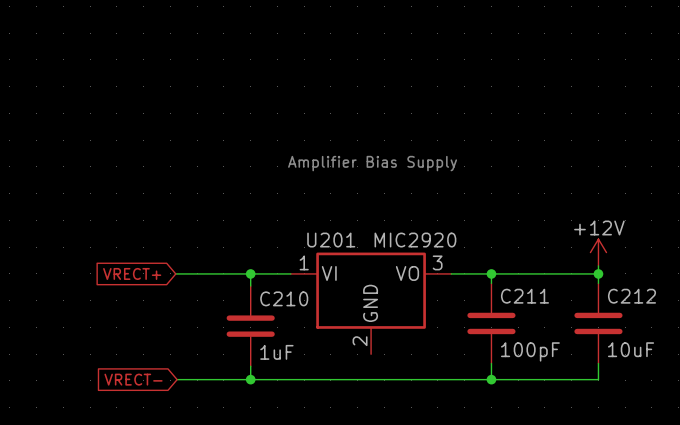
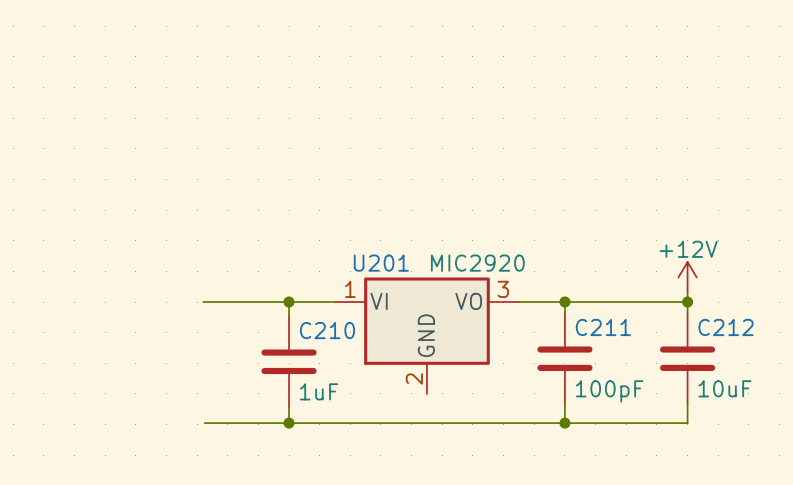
text: Amplifier Bias Supply (372, 163) -> none
global label: VRECT+ (132, 273) -> none
global label: VRECT- (133, 379) -> none

